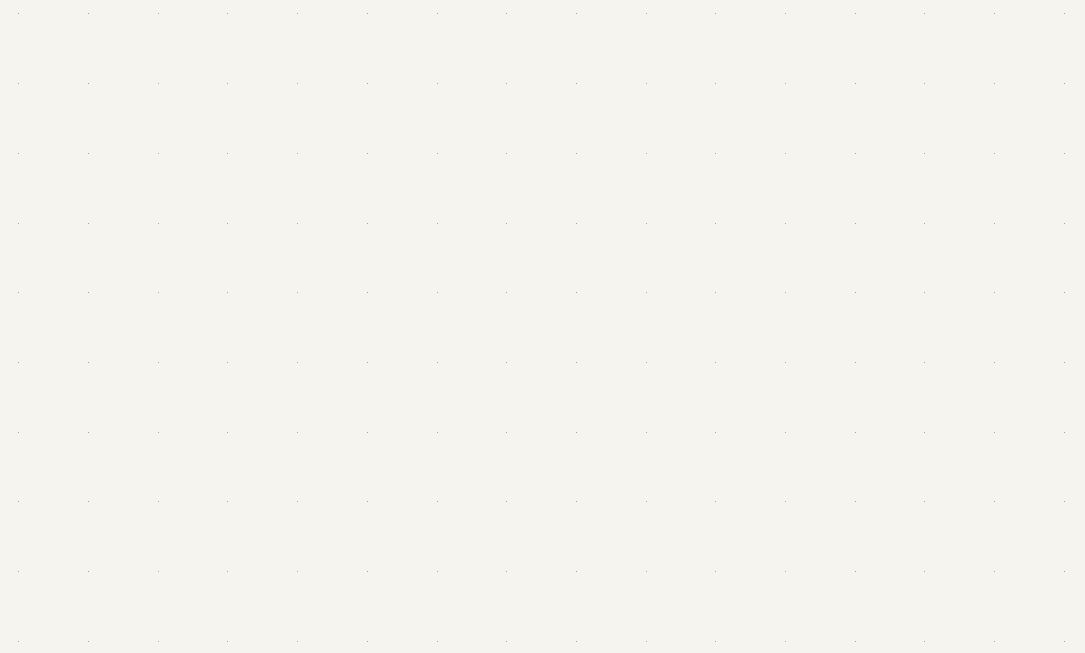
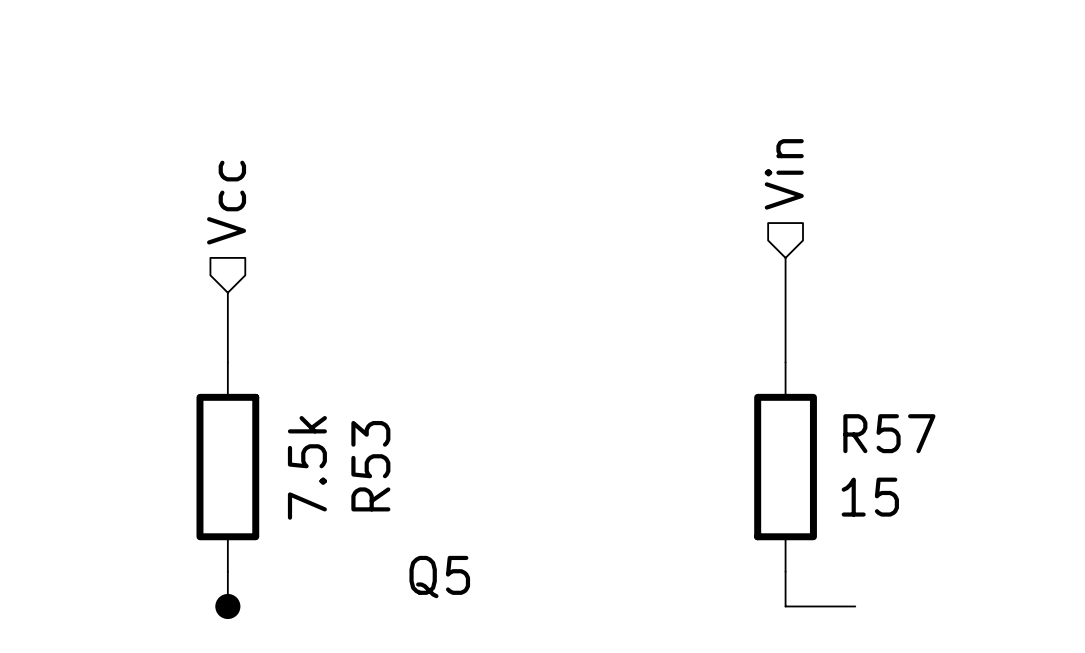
hierarchical label: none -> Vin (784, 174)
hierarchical label: none -> Vcc (226, 202)
wire: none -> (785, 257) (785, 362)
wire: none -> (227, 292) (227, 362)
R53: none -> 7.5k (227, 467)
R57: none -> 15 (785, 467)
wire: none -> (227, 571) (227, 606)
wire: none -> (785, 571) (785, 606) (855, 606)
label: none -> Q5 (439, 577)
junction: none -> (227, 606)

